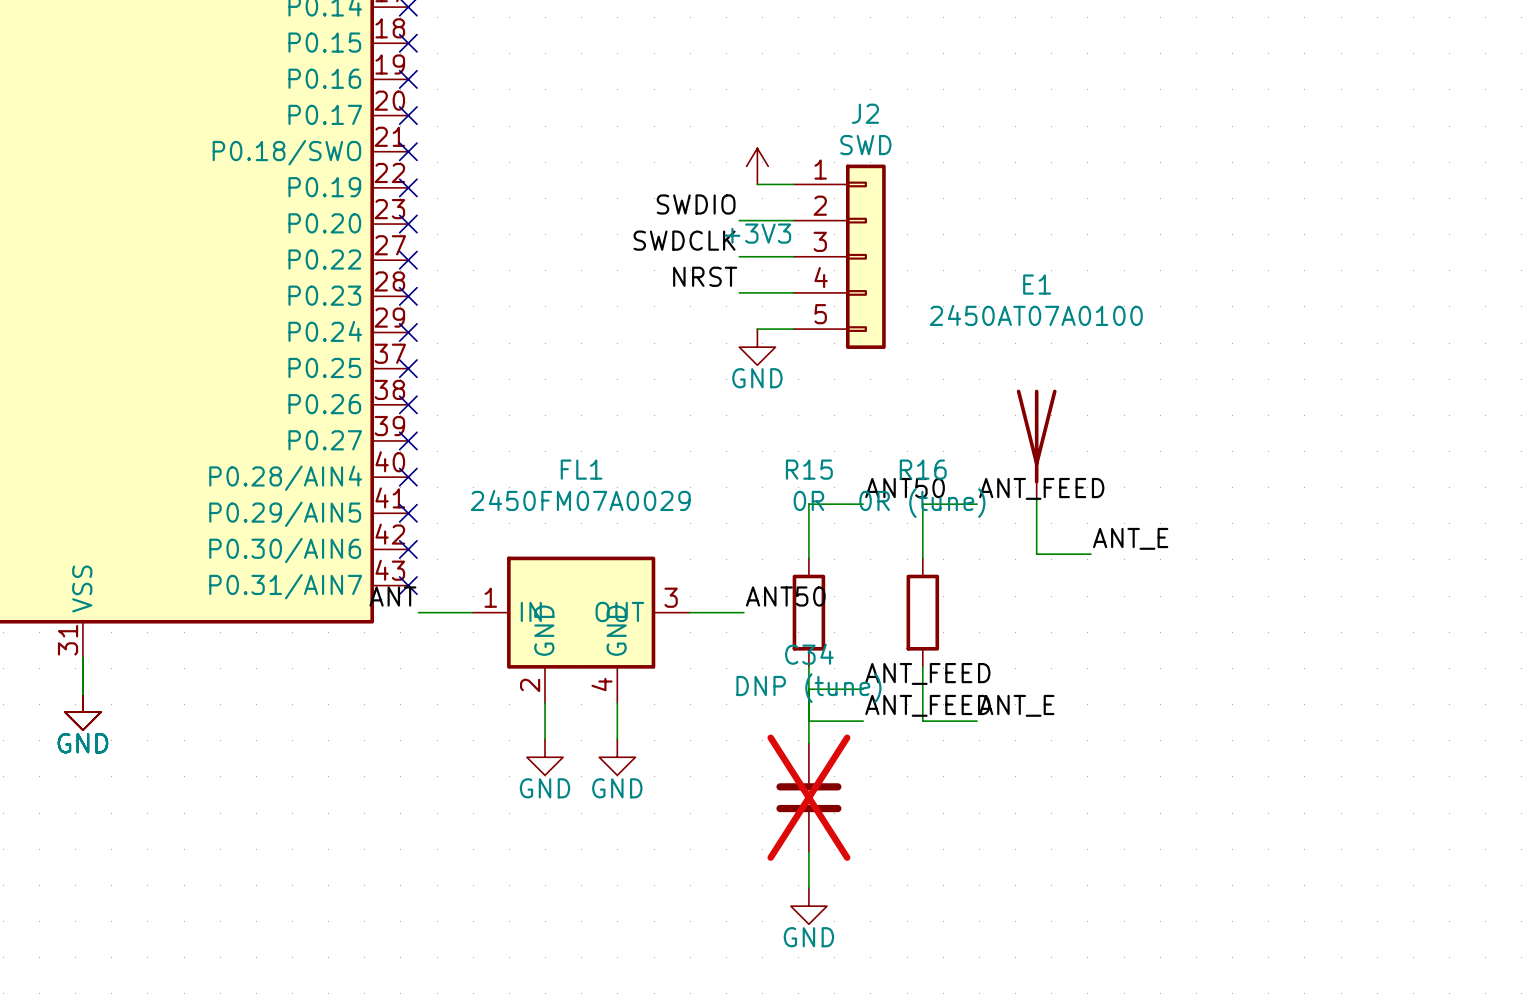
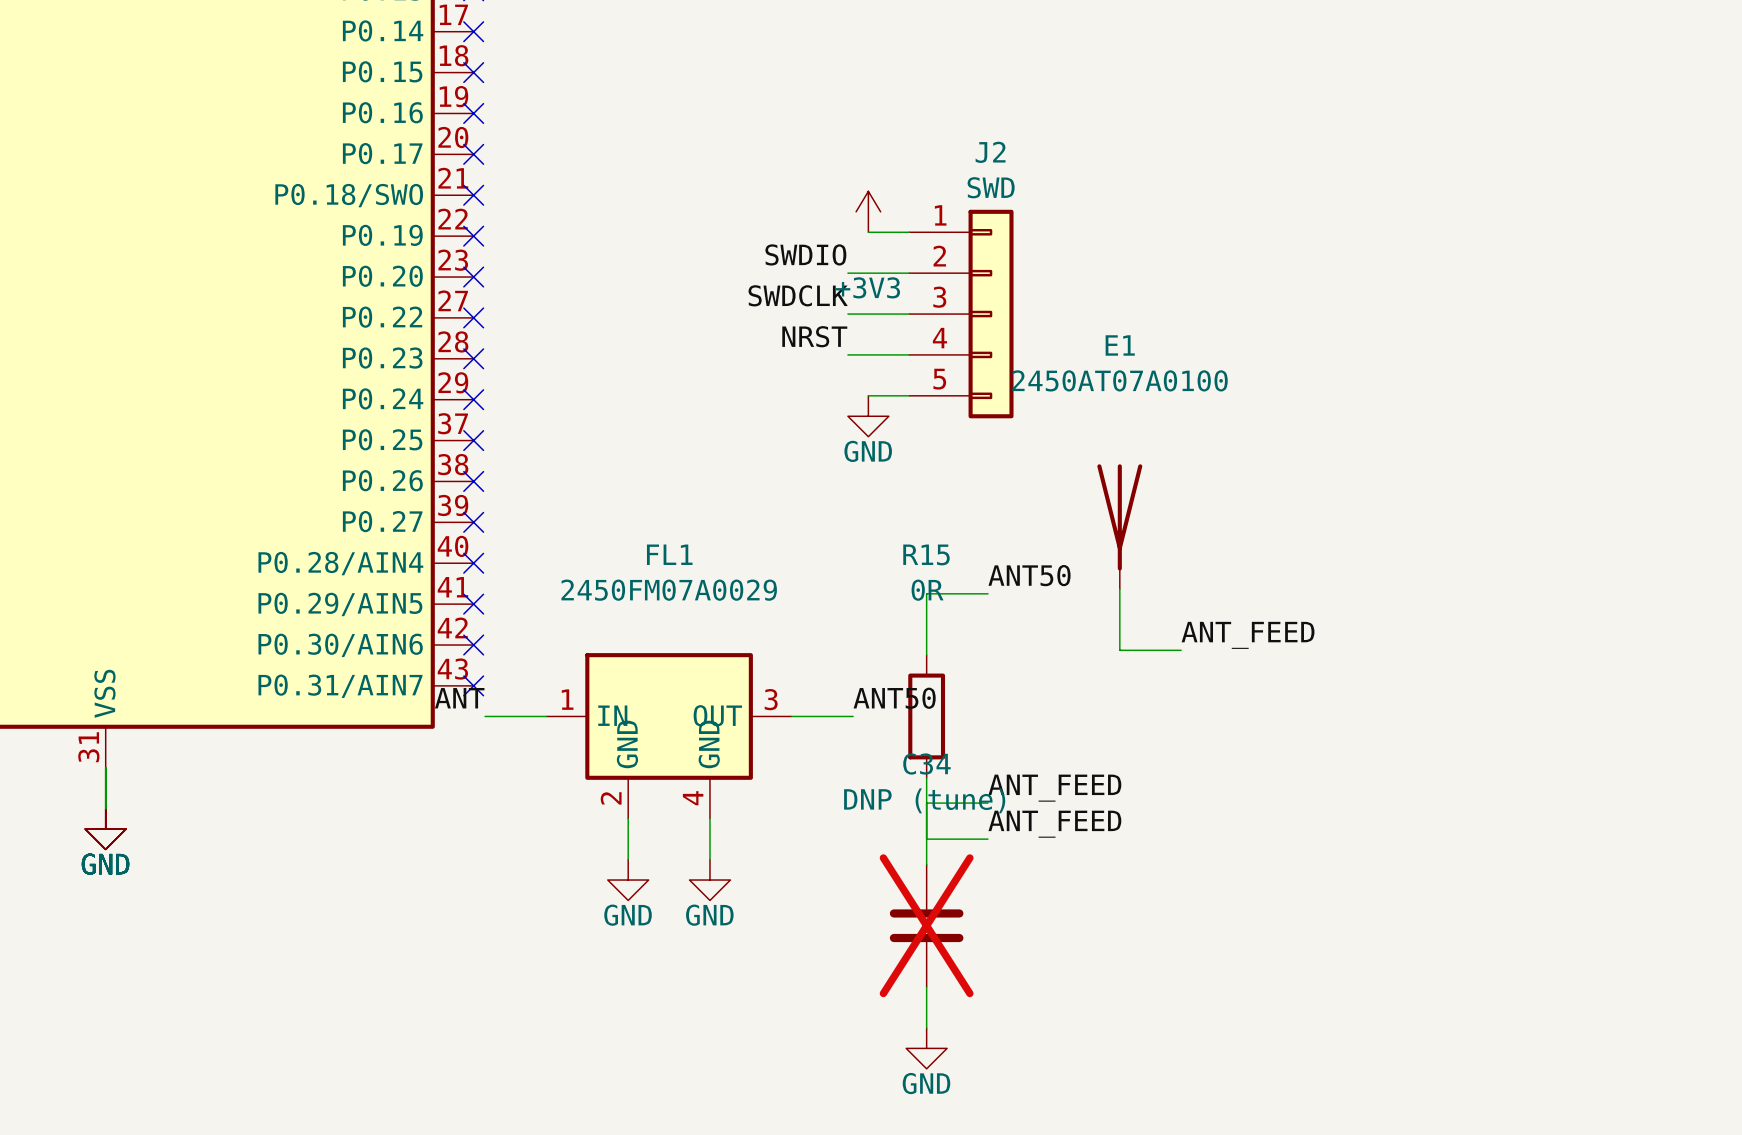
E1 position: (1036, 444) -> (1119, 526)
label position: ANT_FEED (1041, 488) -> ANT_FEED (1248, 635)
wire: (1036, 499) (1036, 554) (1090, 554) -> (1119, 588) (1119, 650) (1181, 650)
wire: (977, 504) (922, 504) (922, 558) -> none
label: ANT_E (1130, 538) -> none
R16: 0R (tune) (922, 612) -> none
wire: (922, 666) (922, 721) (977, 721) -> none
label: ANT_E (1016, 705) -> none

